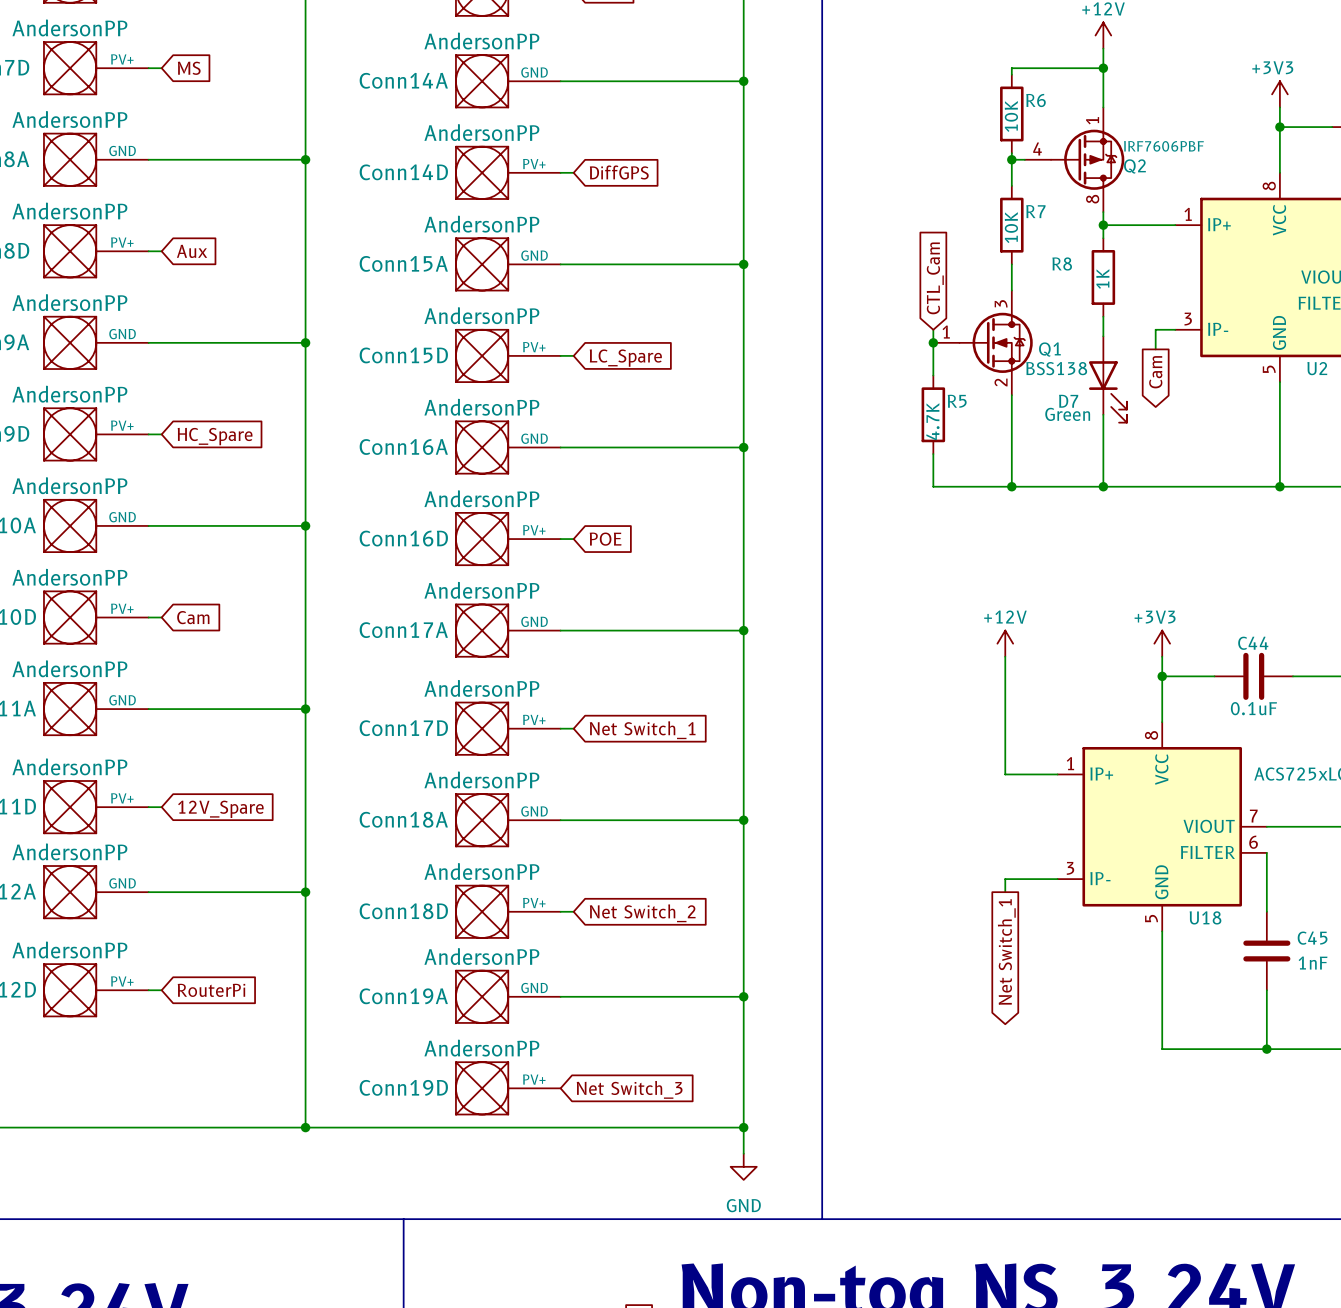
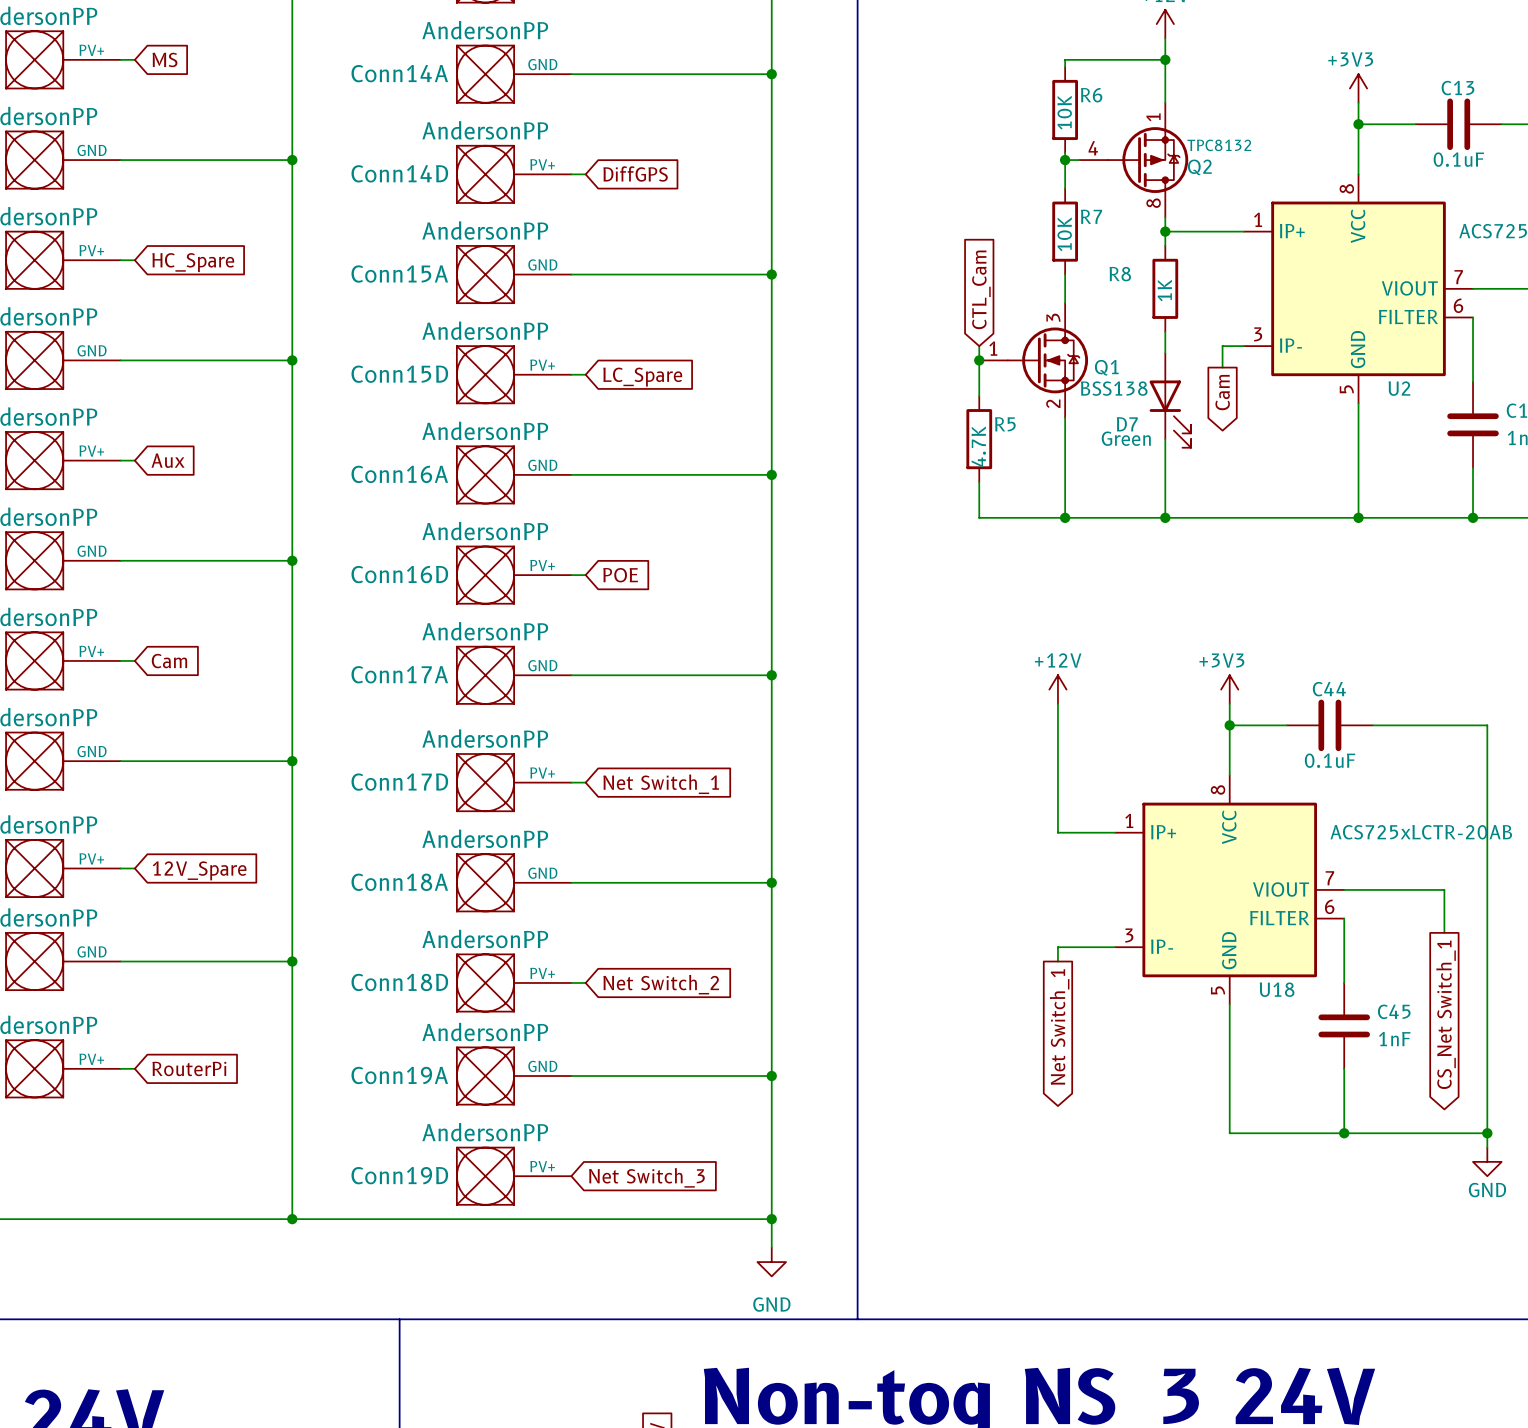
Q2 value: IRF7606PBF (1163, 146) -> TPC8132 (1219, 145)
global label: Aux (192, 251) -> HC_Spare (193, 262)
global label: HC_Spare (215, 436) -> Aux (168, 460)

